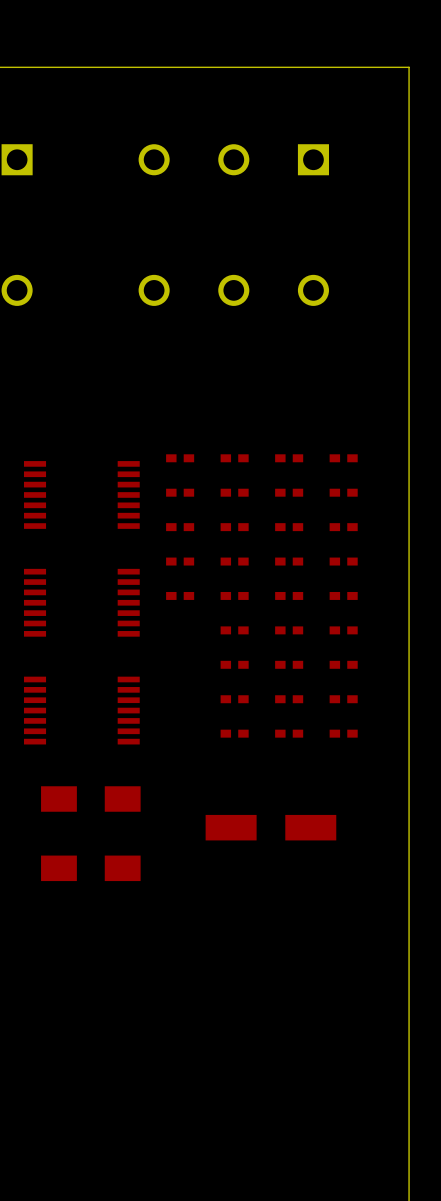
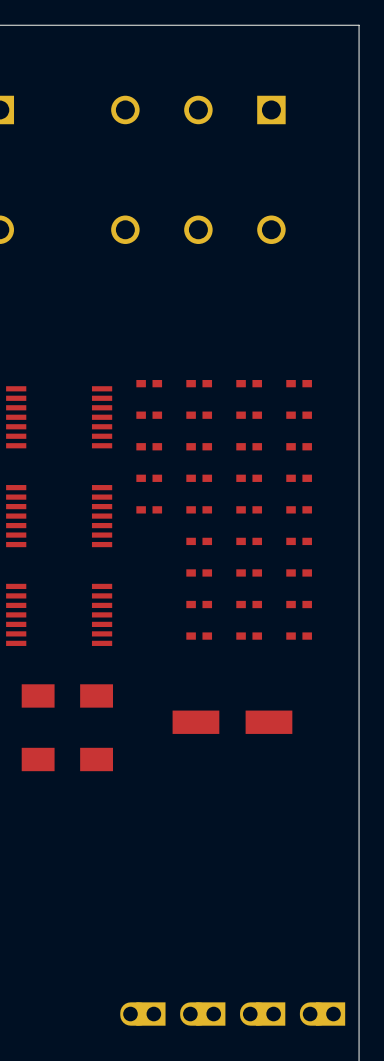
part: none -> (142, 1014)
part: none -> (202, 1014)
part: none -> (262, 1014)
part: none -> (322, 1014)

